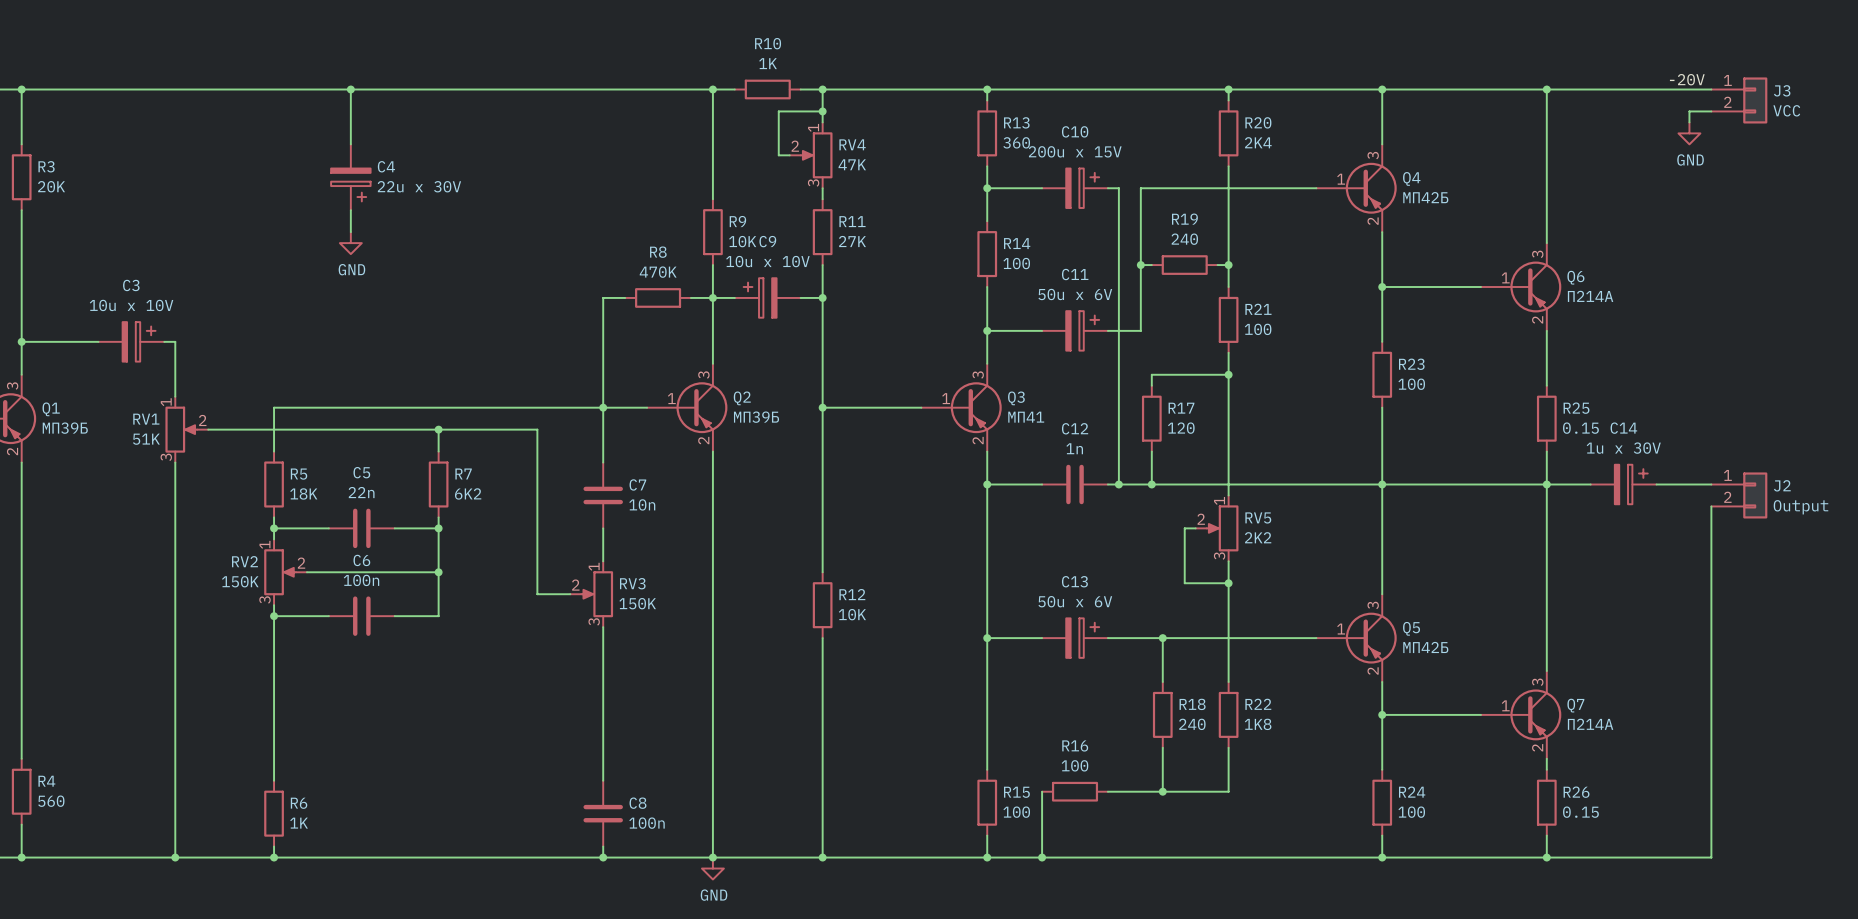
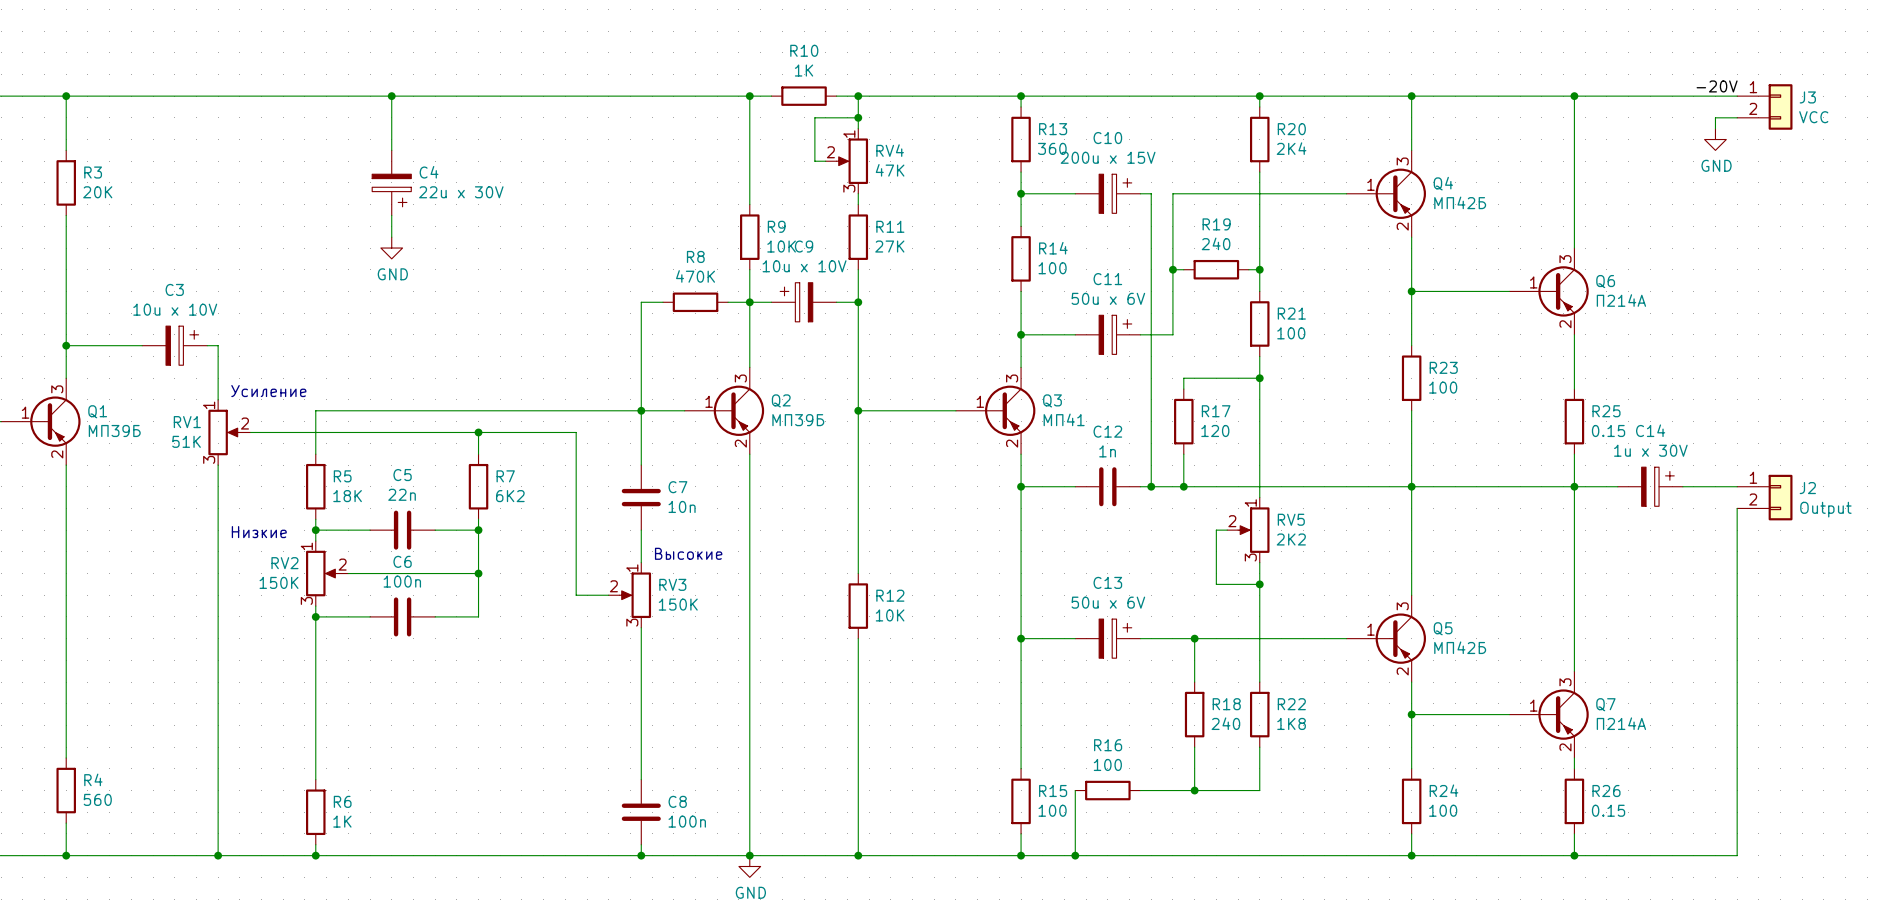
text: none -> Усиление (268, 391)
text: none -> Низкие (259, 532)
text: none -> Высокие (688, 553)

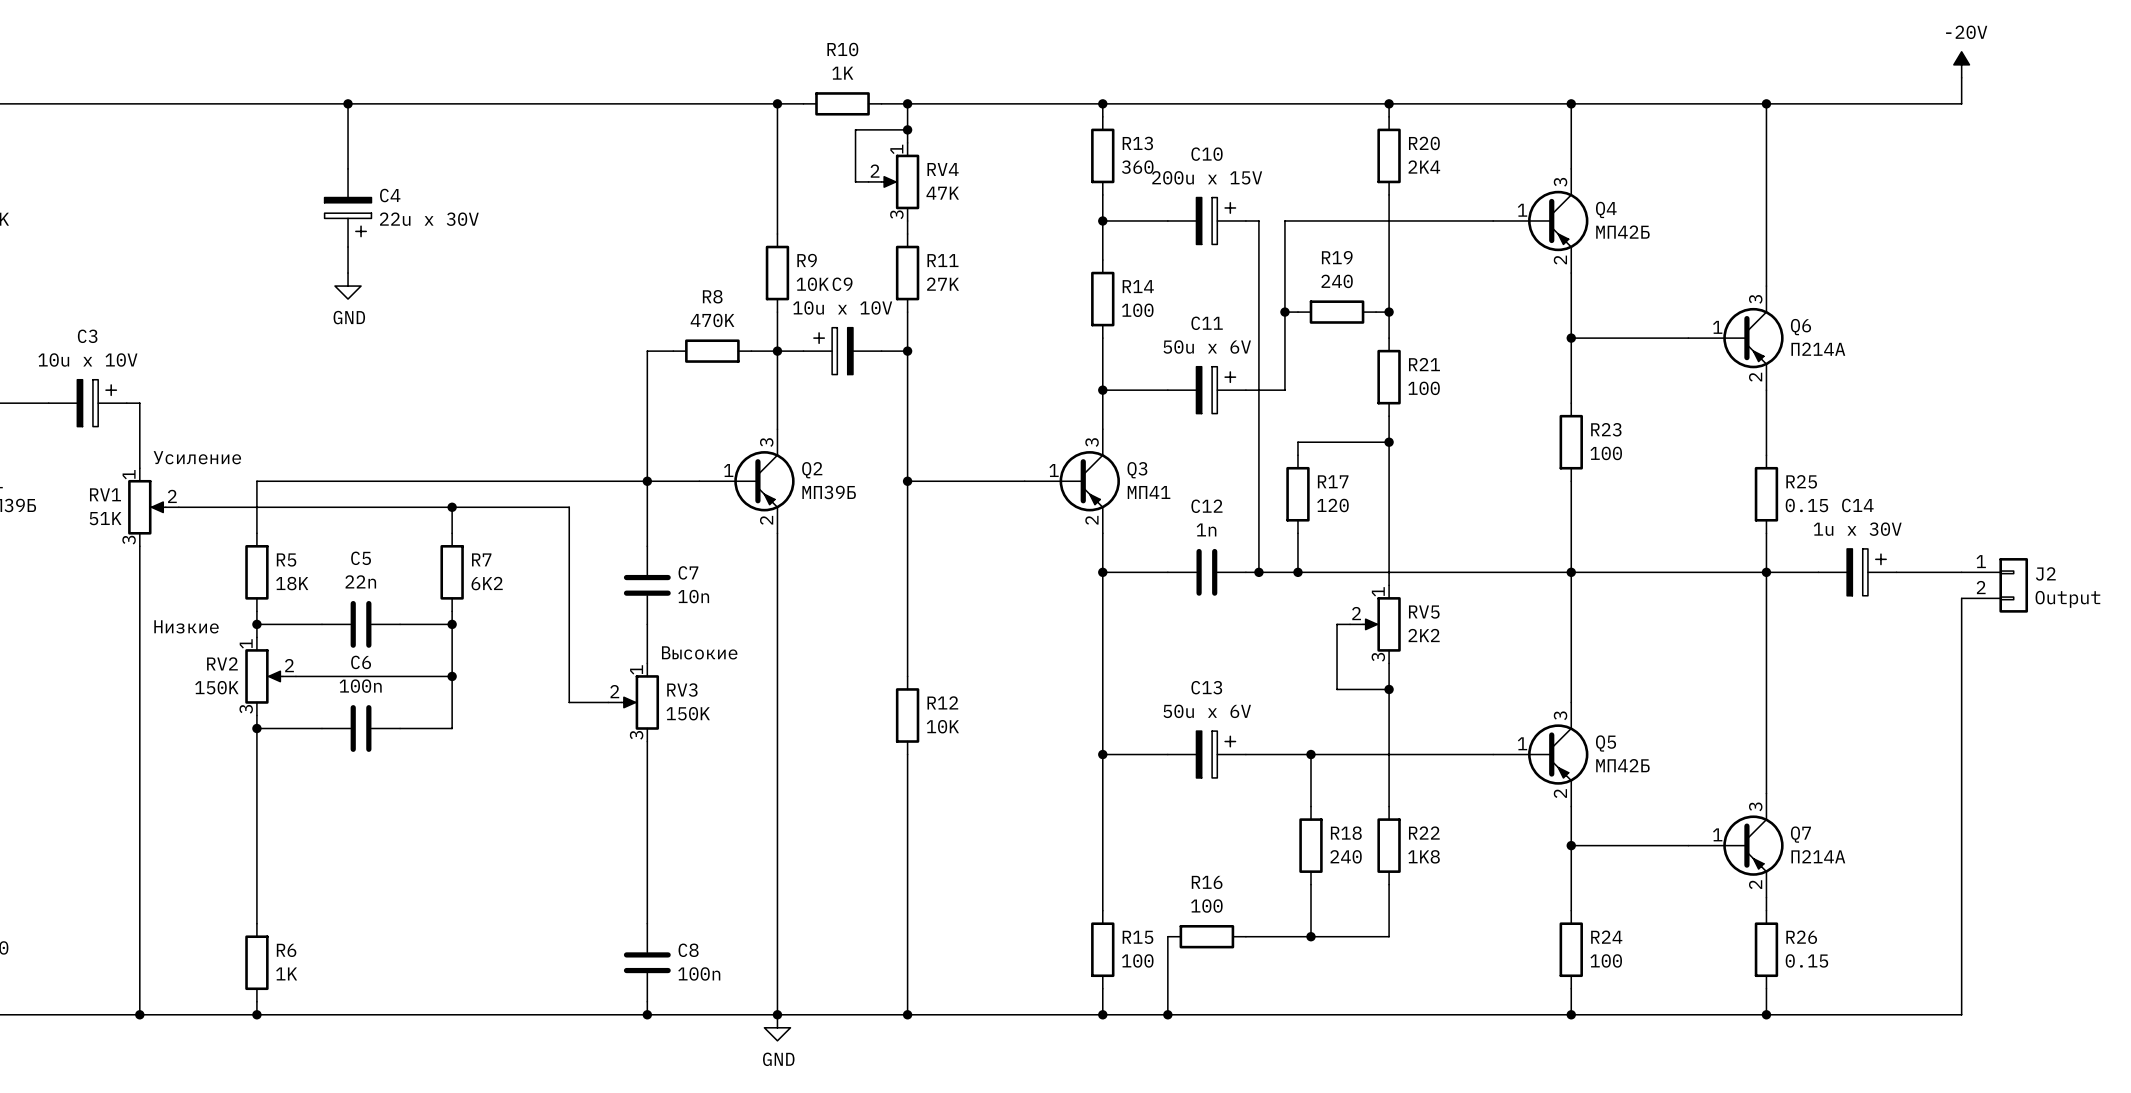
power symbol: none -> -20V (1961, 64)
wire: none -> (1961, 77) (1961, 103)
label: -20V (1717, 86) -> none
J3: VCC (1764, 106) -> none
wire: (1737, 117) (1715, 117) (1715, 128) -> none
power symbol: GND (1715, 139) -> none

